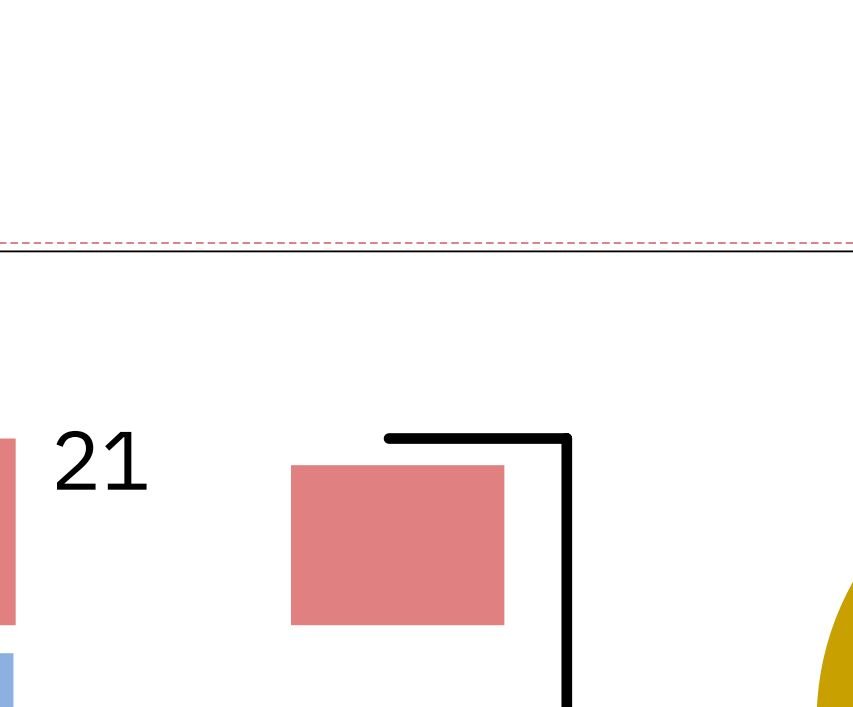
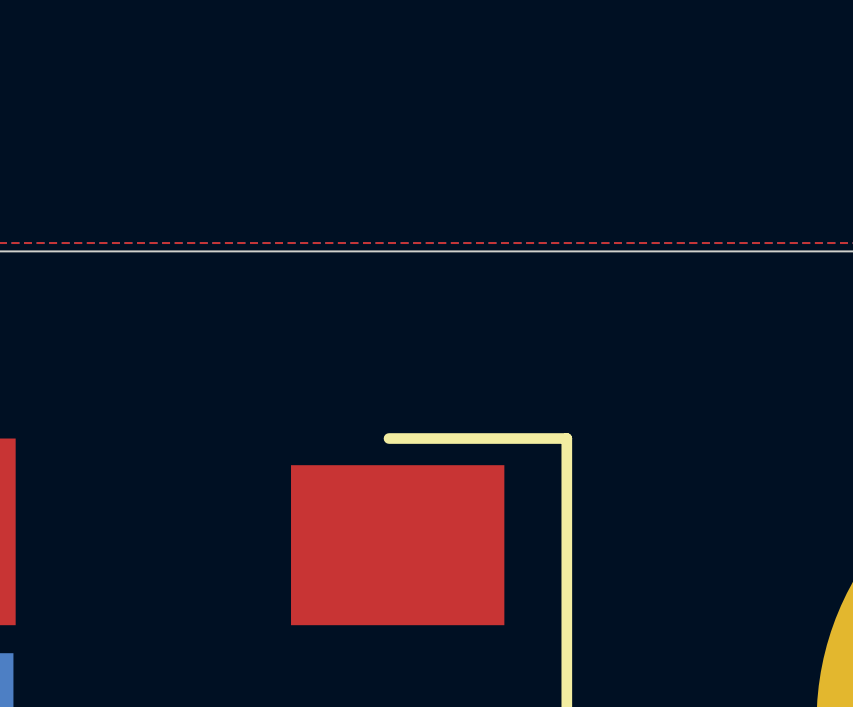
text: 21 (101, 460) -> none

